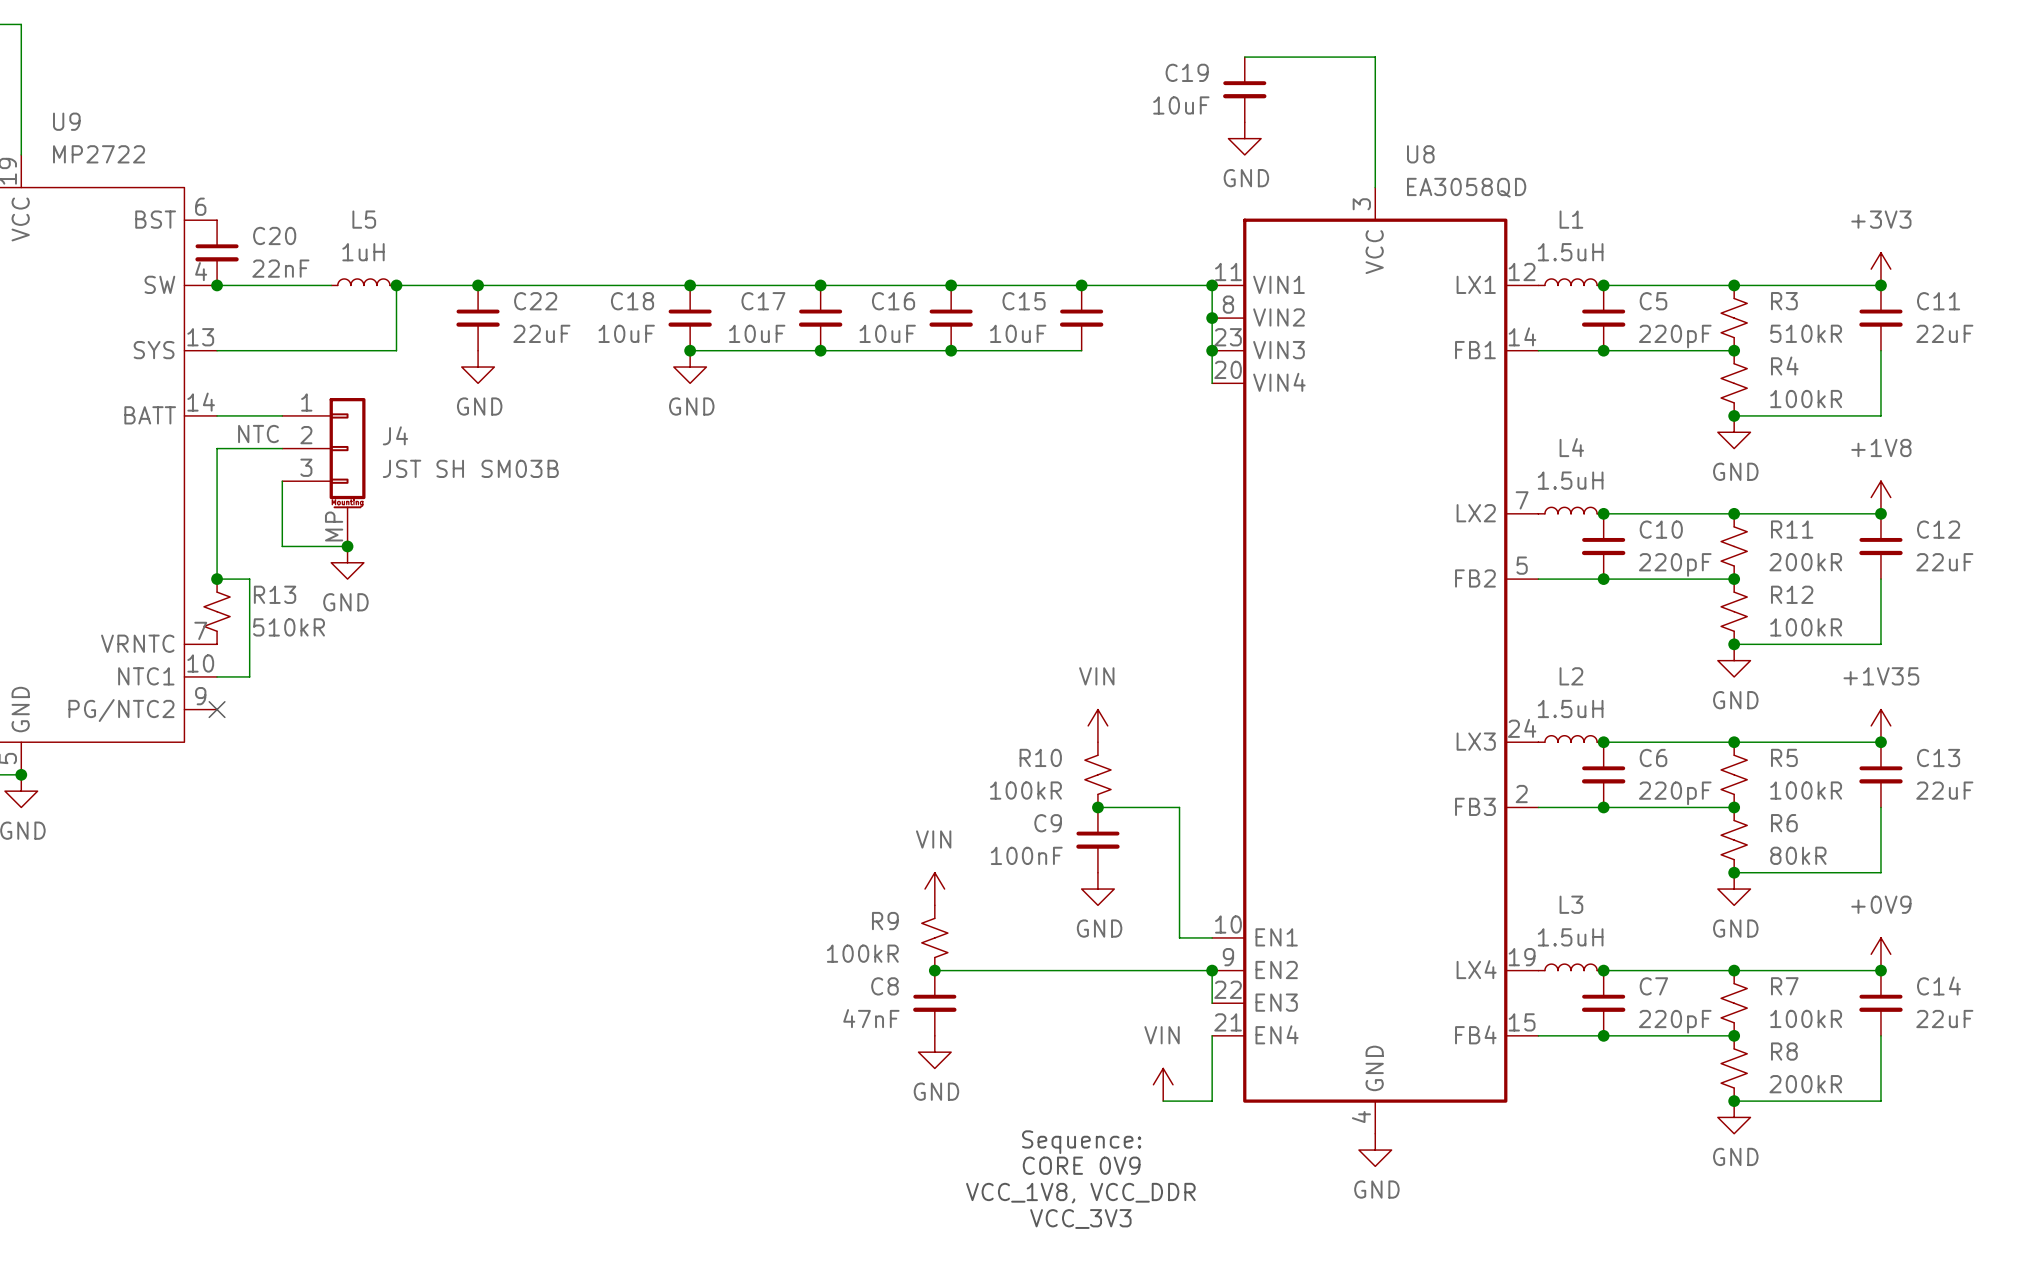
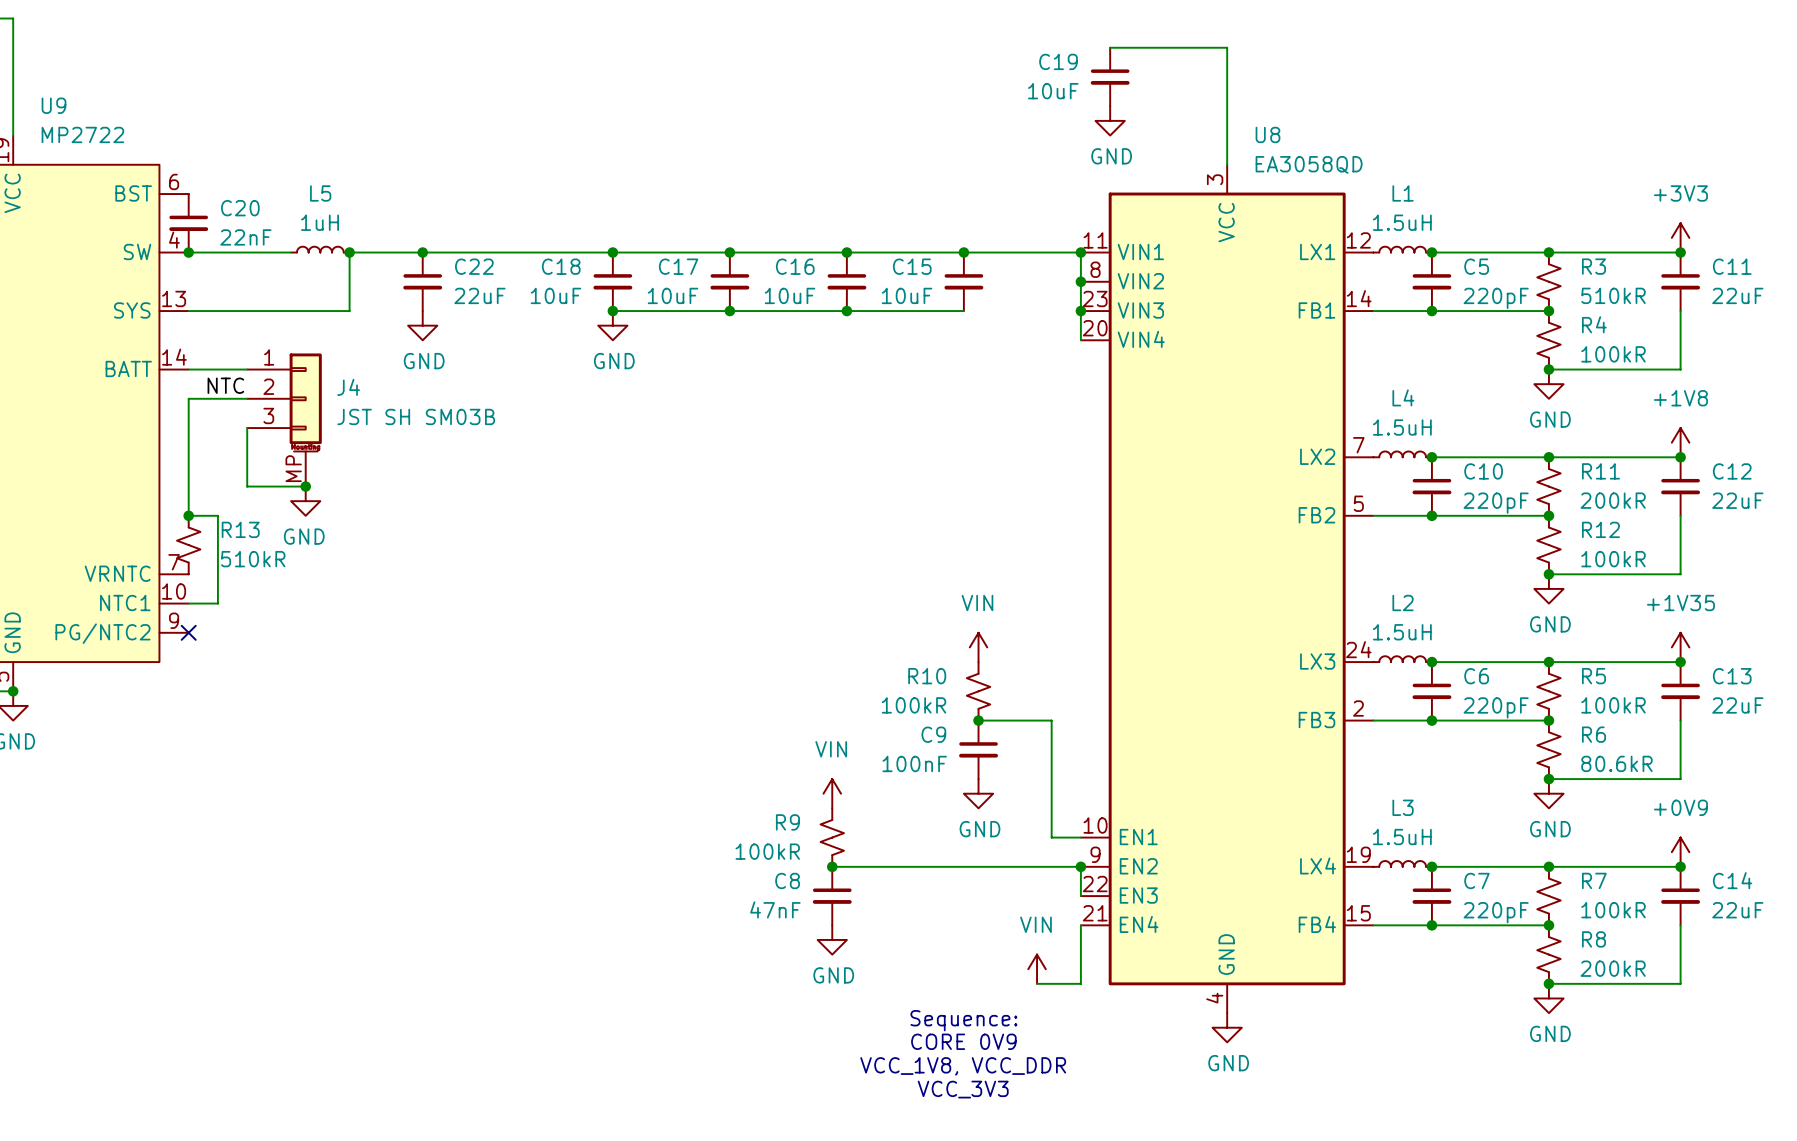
R6 value: 80kR (1798, 855) -> 80.6kR (1616, 763)

